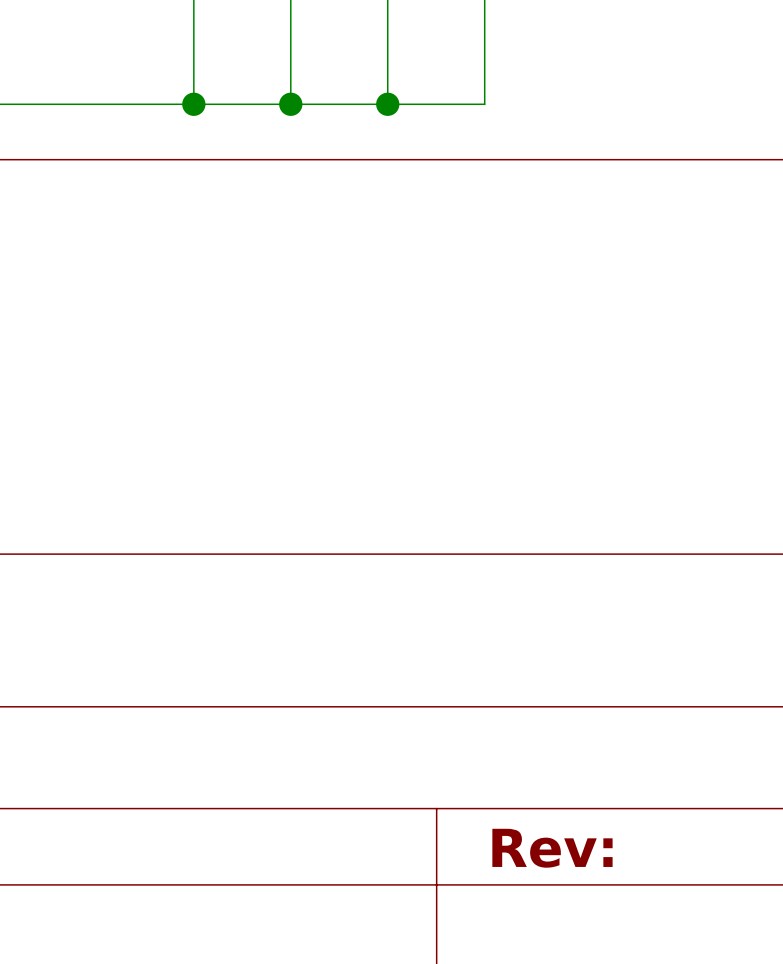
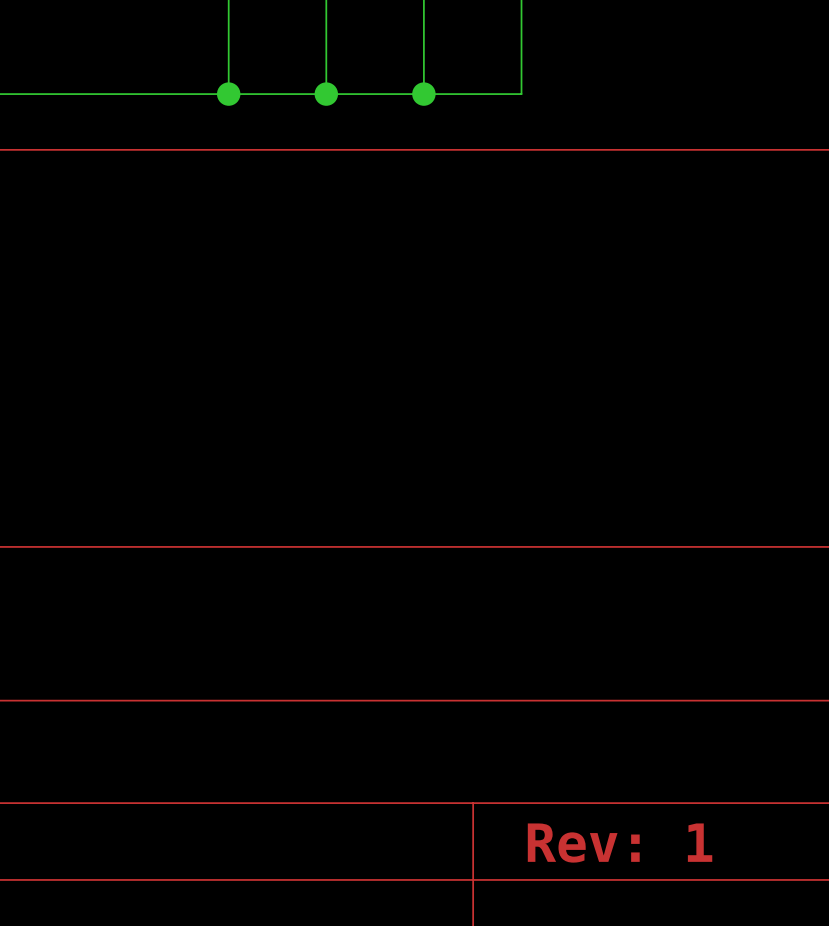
title block: Rev: (552, 848) -> Rev: 1 (620, 843)

